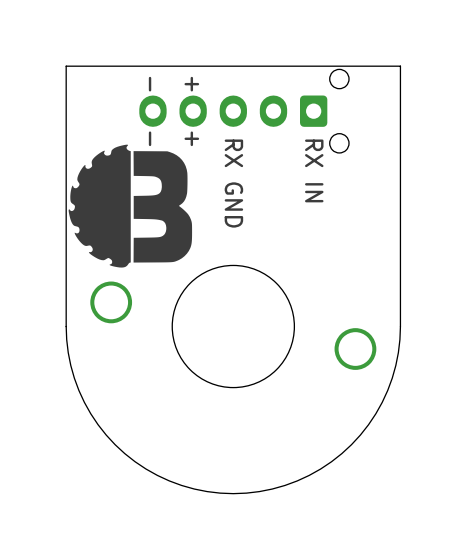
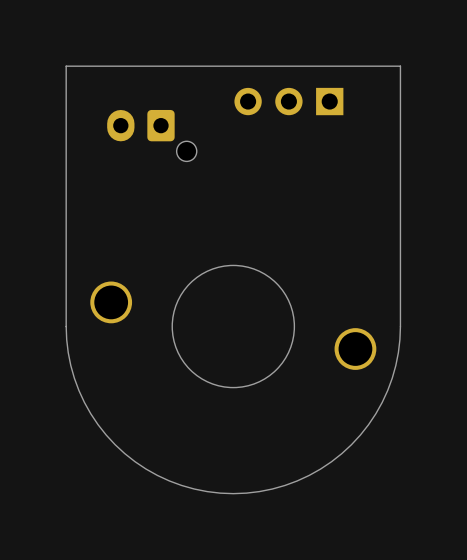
text: - (150, 84) -> none
text: + (191, 84) -> none
part: none -> (288, 101)
part: (244, 111) -> none
part: none -> (151, 135)
text: - (150, 138) -> none
text: + (191, 138) -> none
drawing: [68, 144, 193, 268] -> none
text: RX IN (314, 170) -> none
text: RX GND (233, 183) -> none

